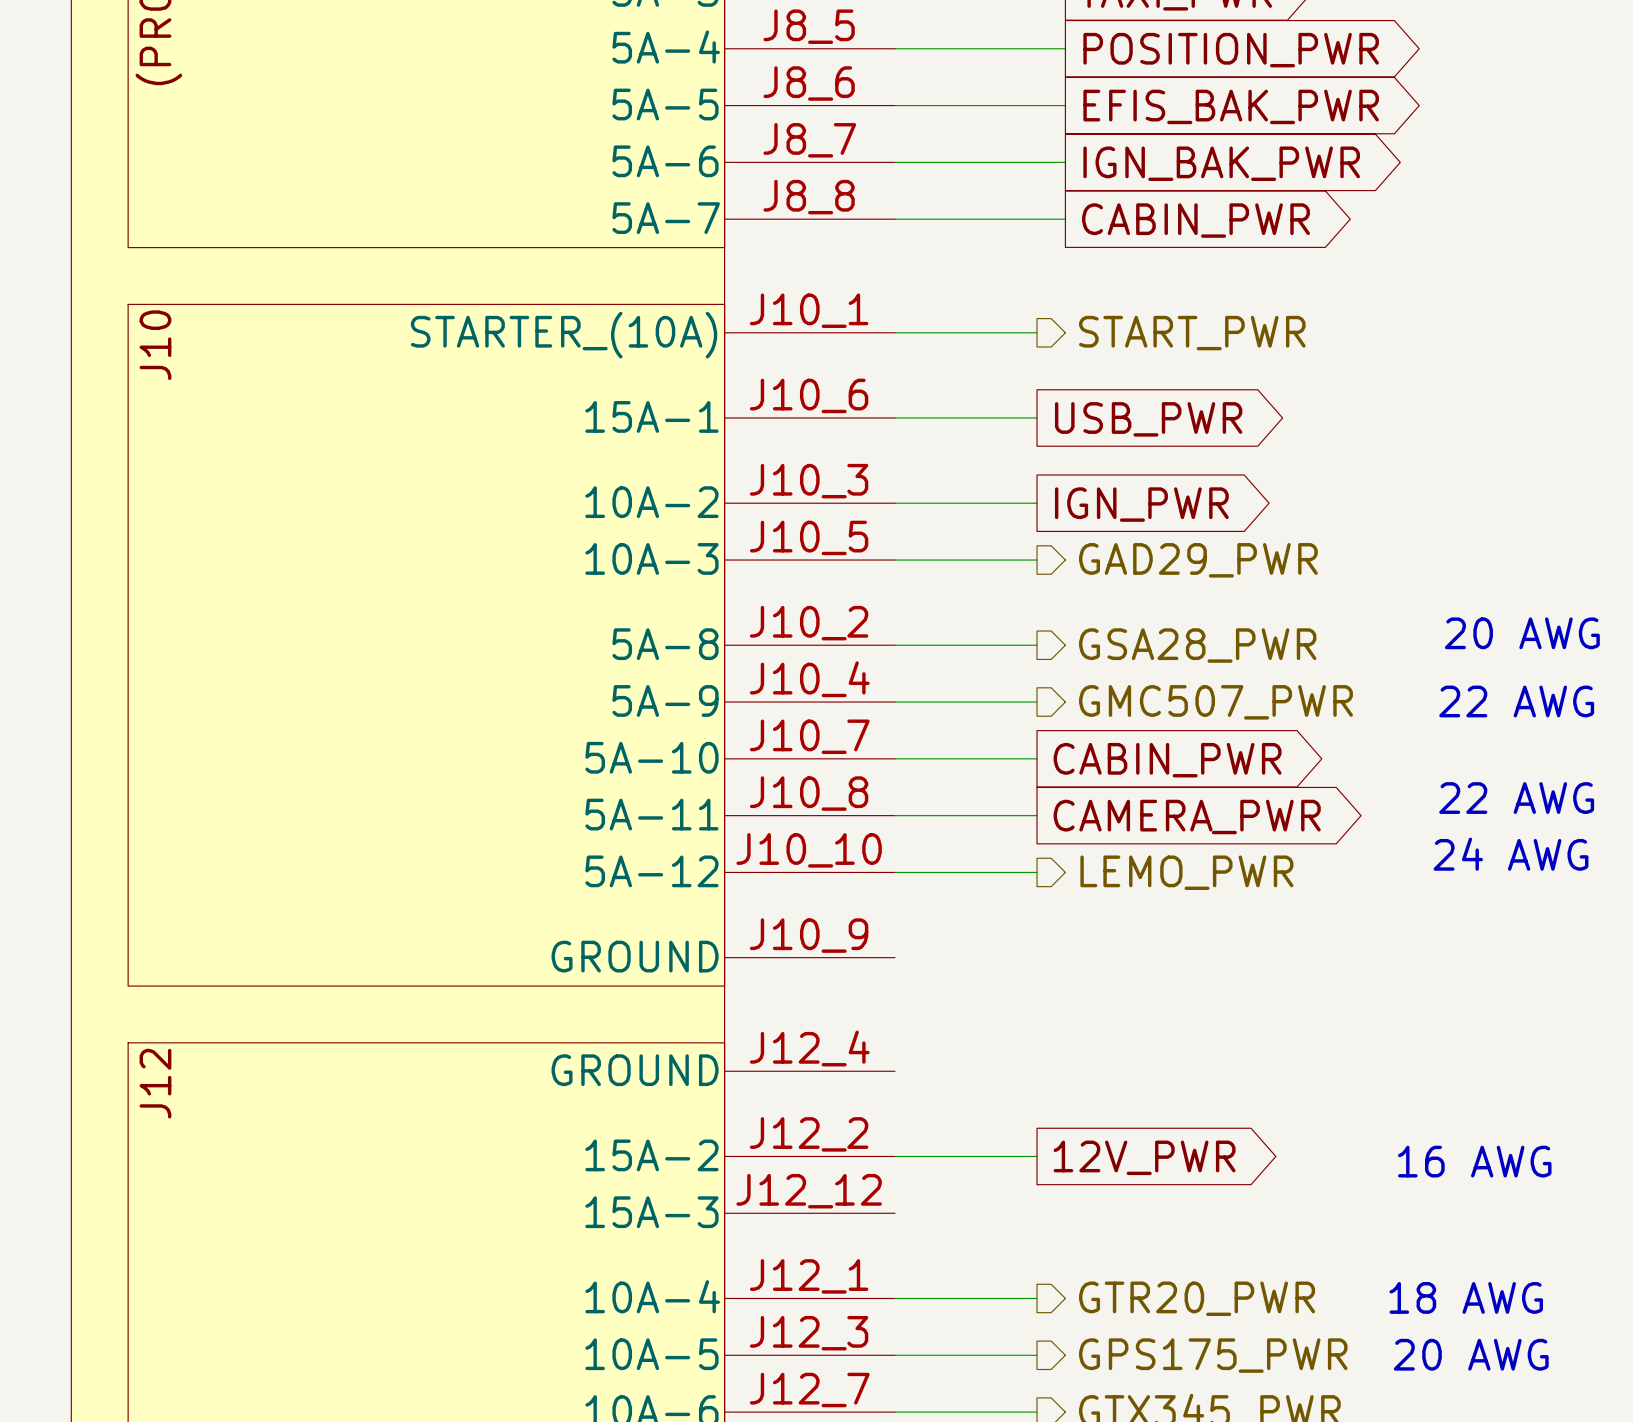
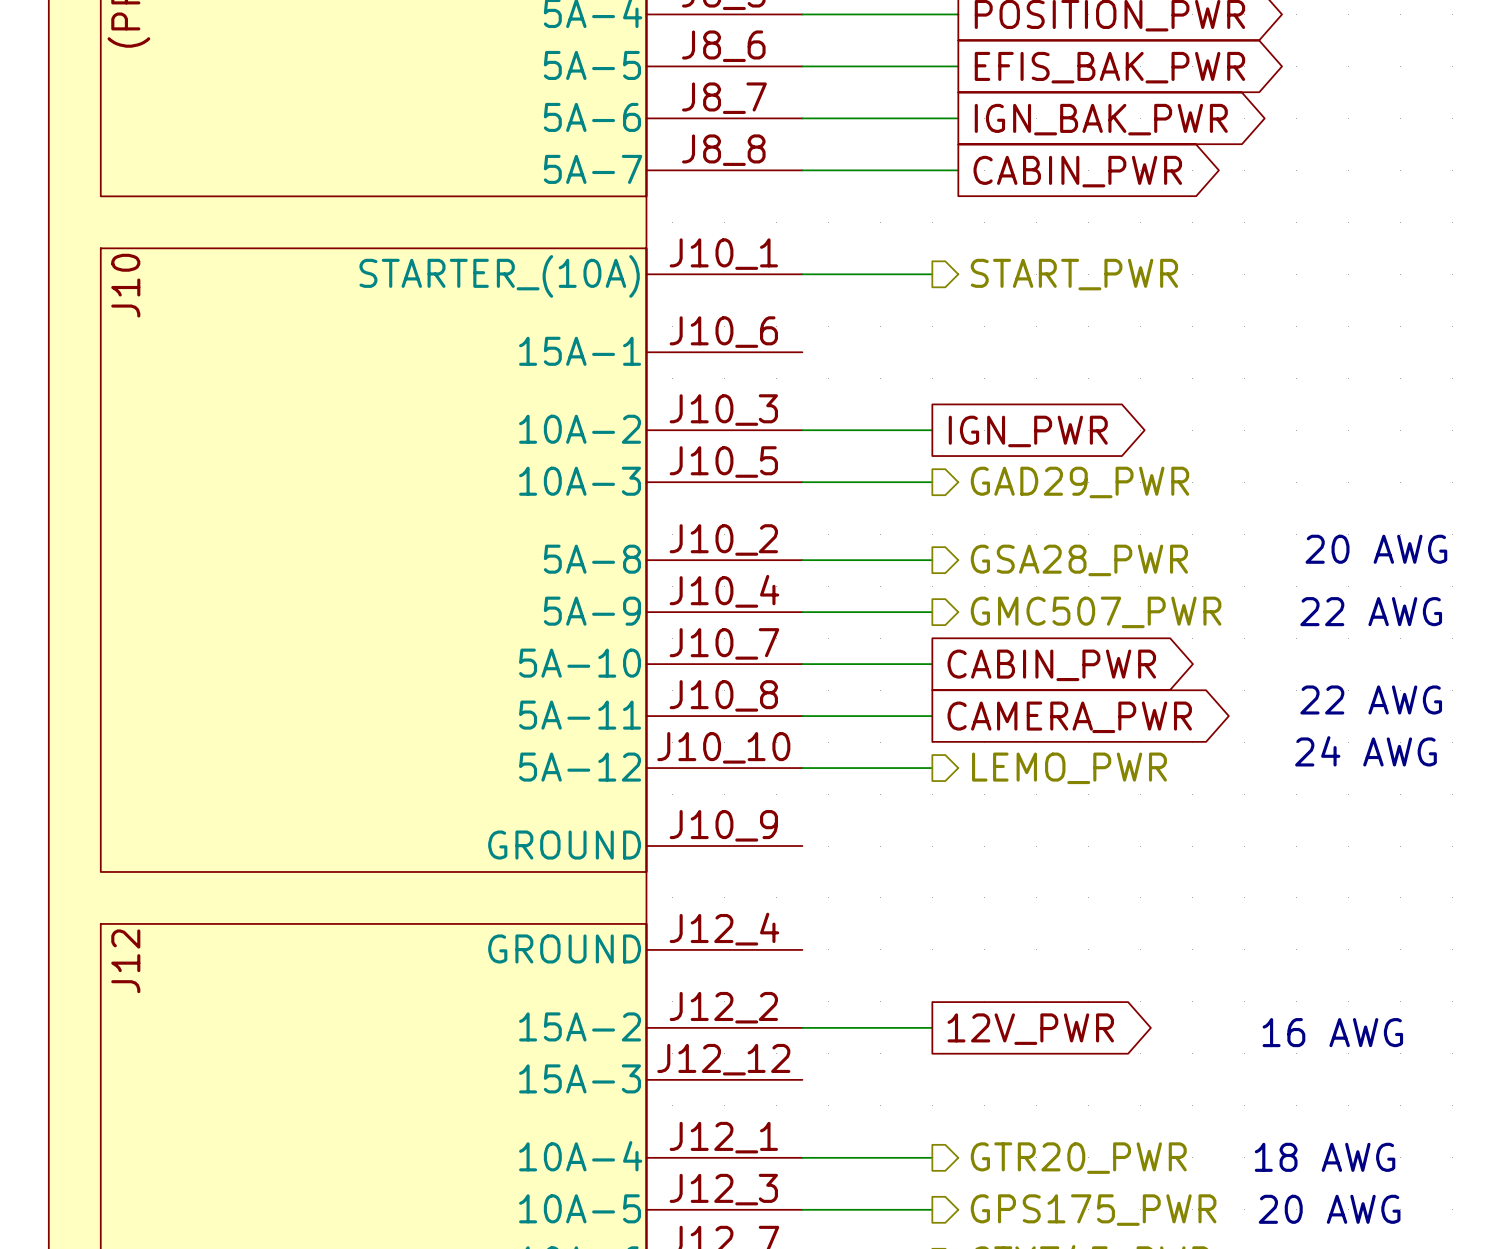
wire: (894, 418) (1037, 418) -> none
global label: USB_PWR (1148, 419) -> none

